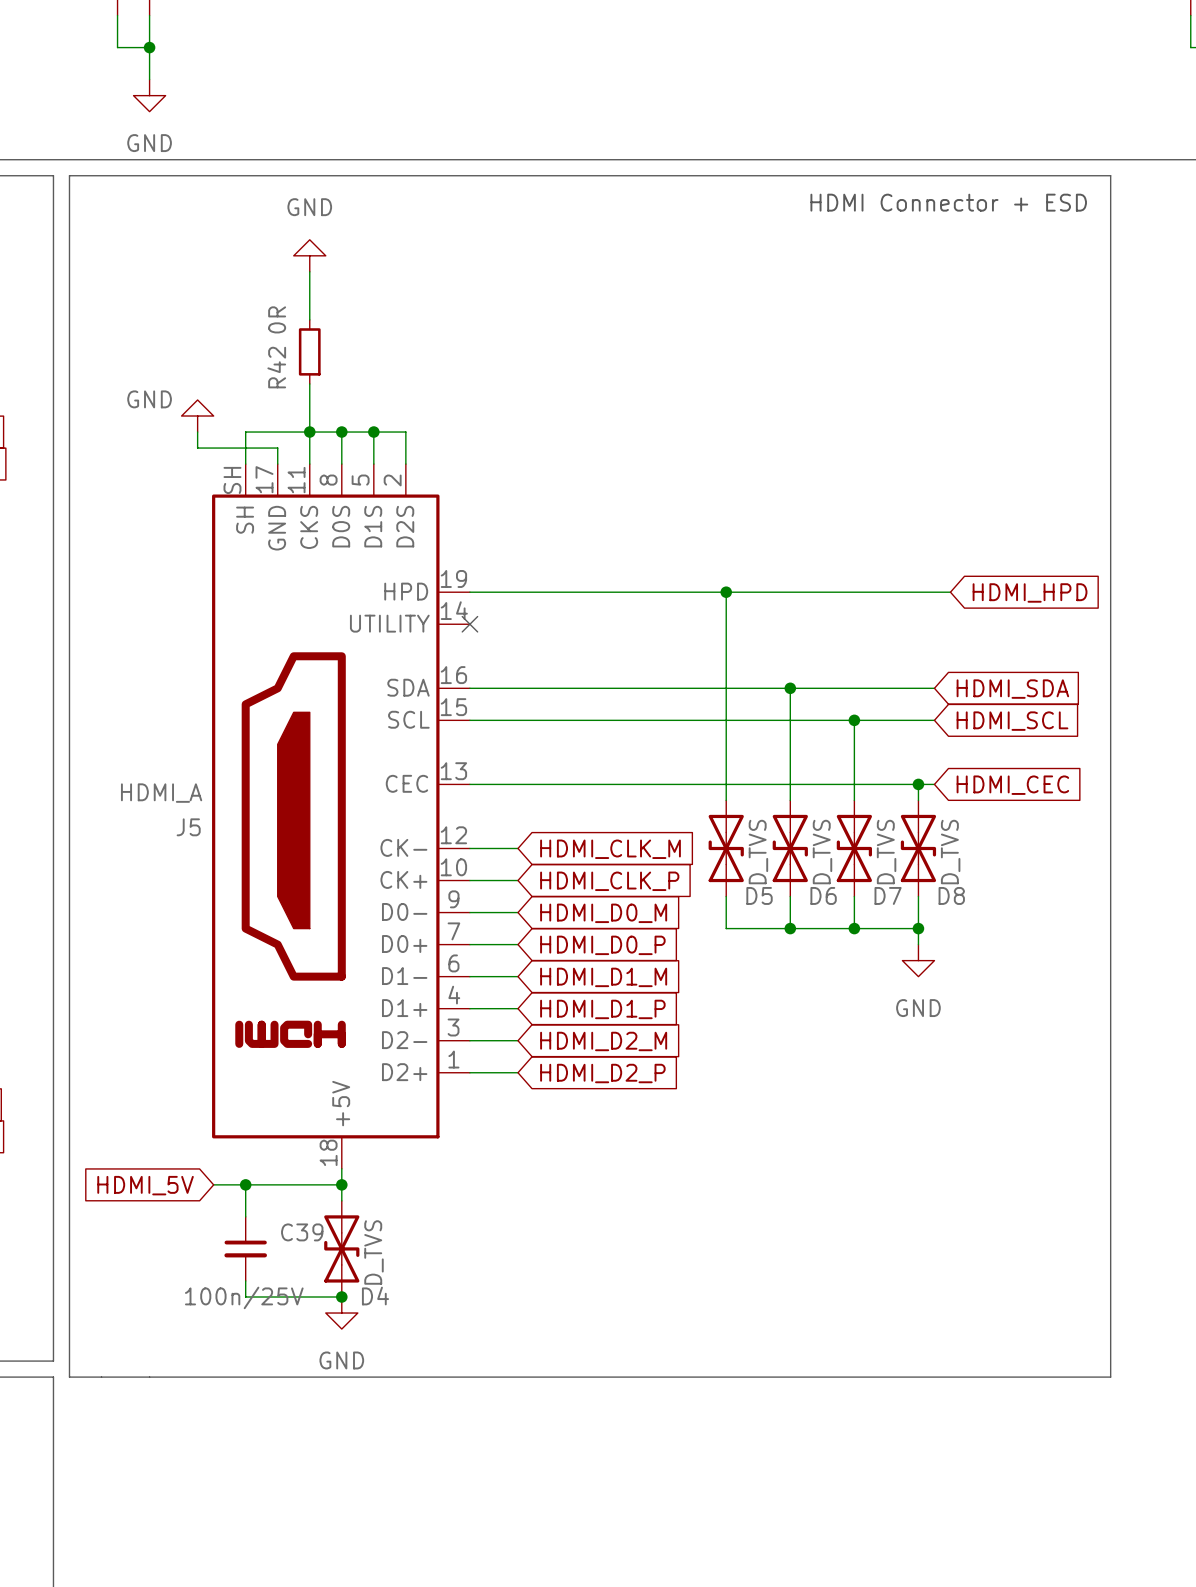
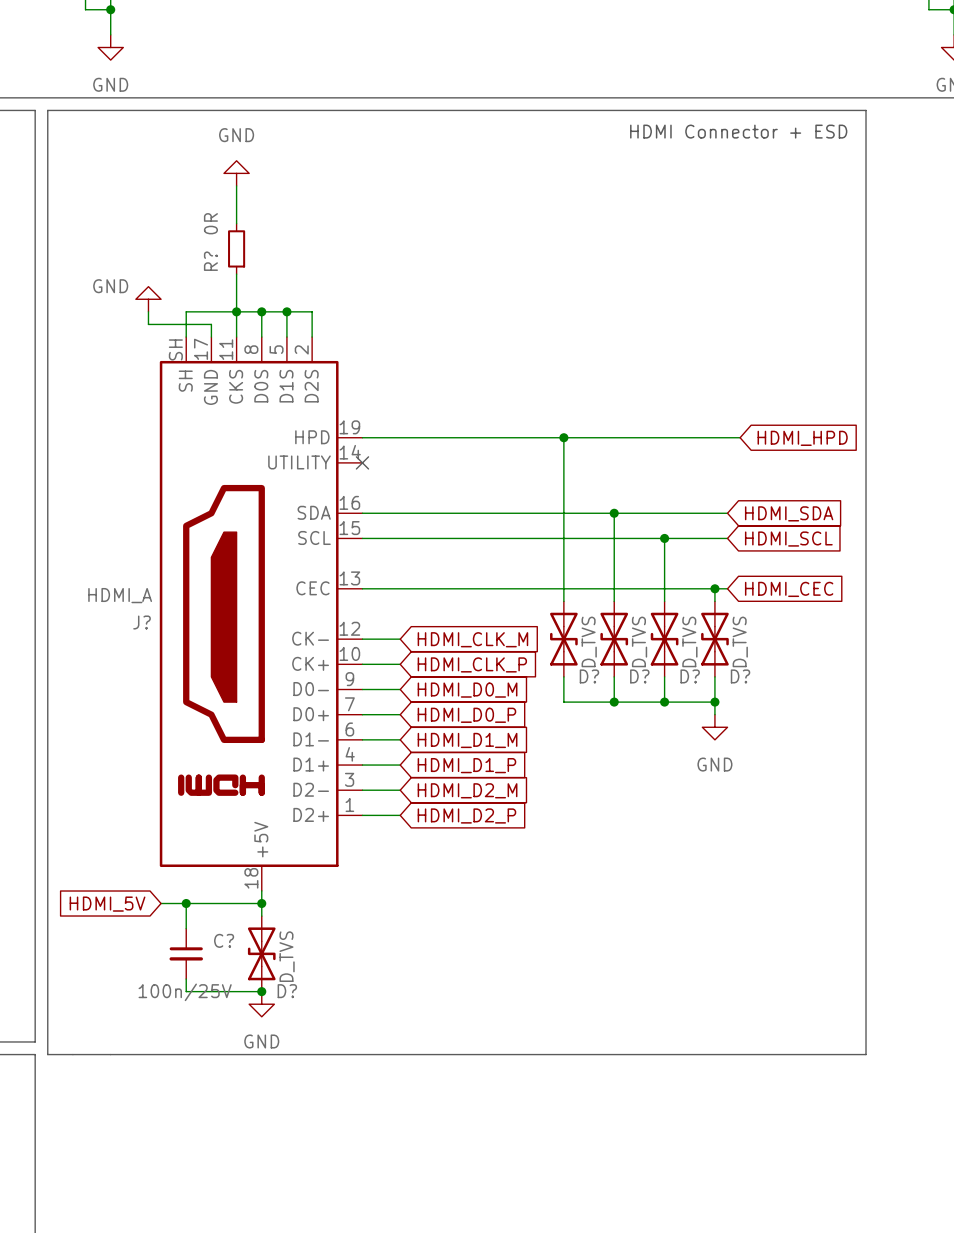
R42 name: R42 (276, 367) -> R? (210, 261)
J5 name: J5 (188, 827) -> J? (142, 622)
D5 name: D5 (759, 895) -> D? (589, 676)
D6 name: D6 (823, 895) -> D? (639, 676)
D7 name: D7 (888, 895) -> D? (690, 676)
D8 name: D8 (951, 895) -> D? (740, 676)
C39 name: C39 (302, 1232) -> C? (224, 940)
D4 name: D4 (375, 1296) -> D? (287, 991)

